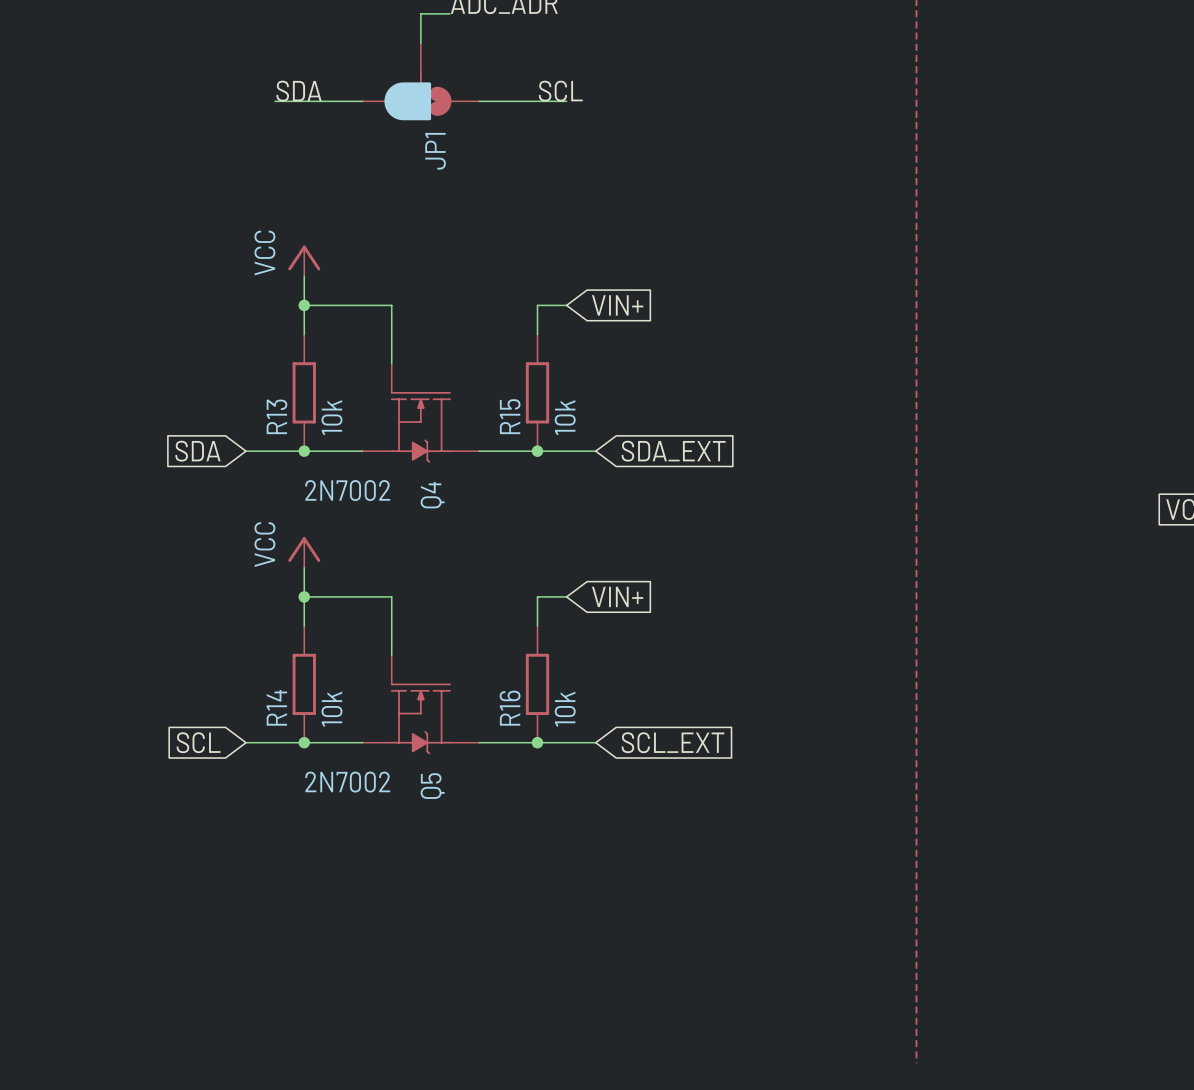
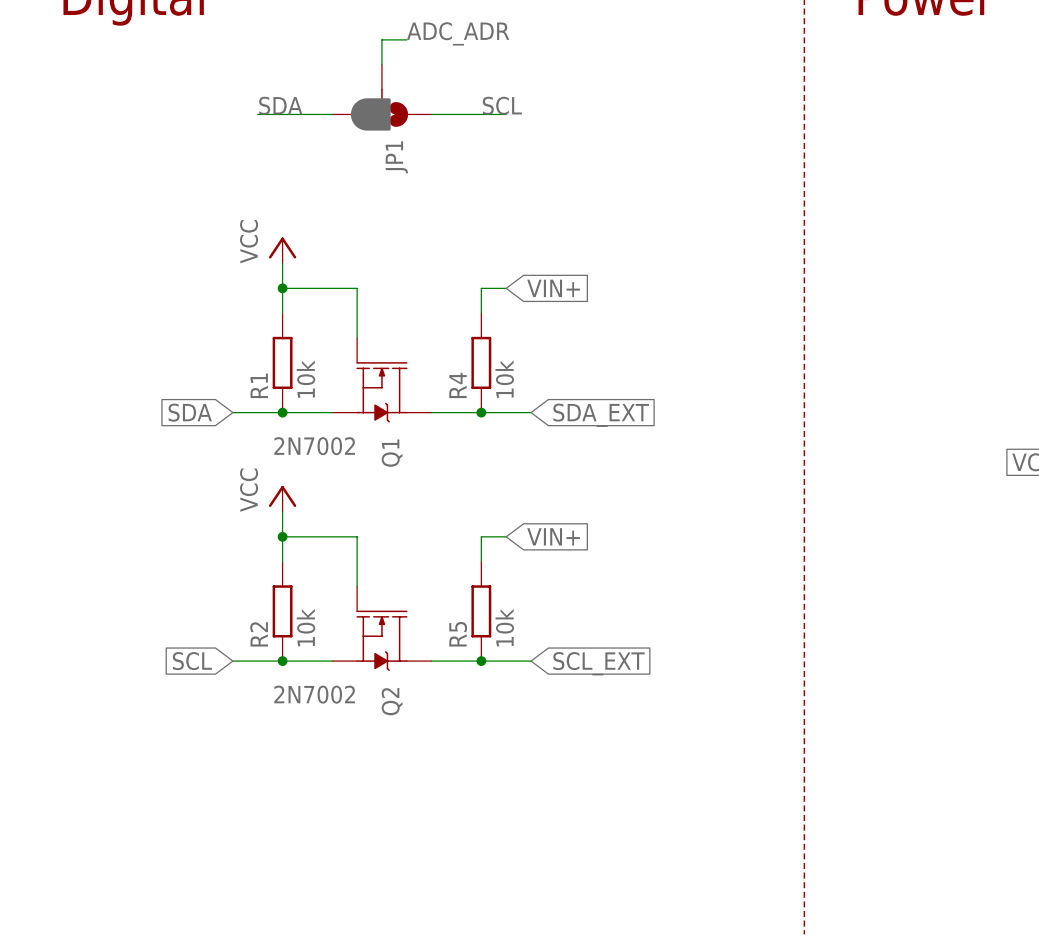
R13 name: R13 (276, 416) -> R1 (259, 385)
R15 name: R15 (510, 416) -> R4 (458, 385)
Q4 name: Q4 (432, 495) -> Q1 (392, 453)
R14 name: R14 (276, 707) -> R2 (259, 634)
R16 name: R16 (510, 708) -> R5 (458, 634)
Q5 name: Q5 (432, 786) -> Q2 (392, 701)

